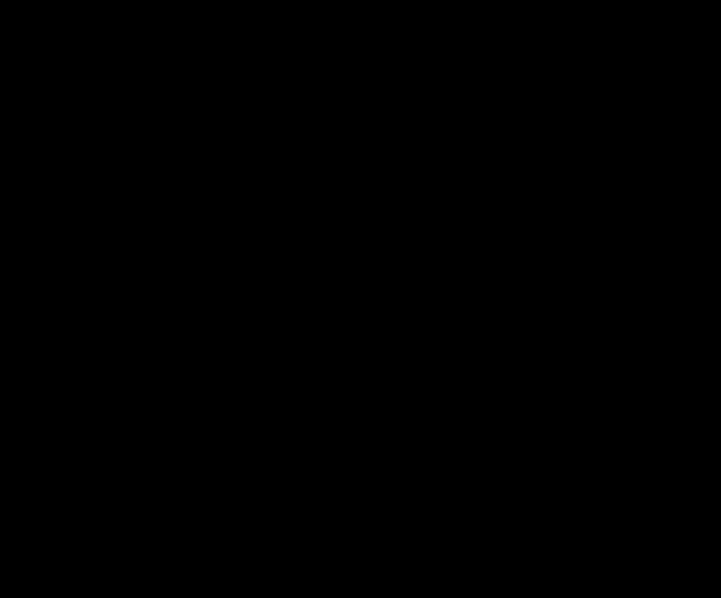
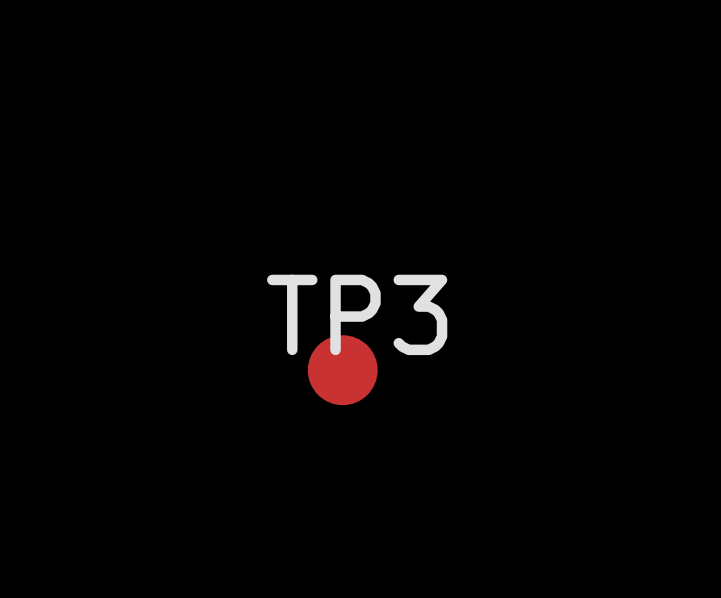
TP3: none -> (342, 370)

